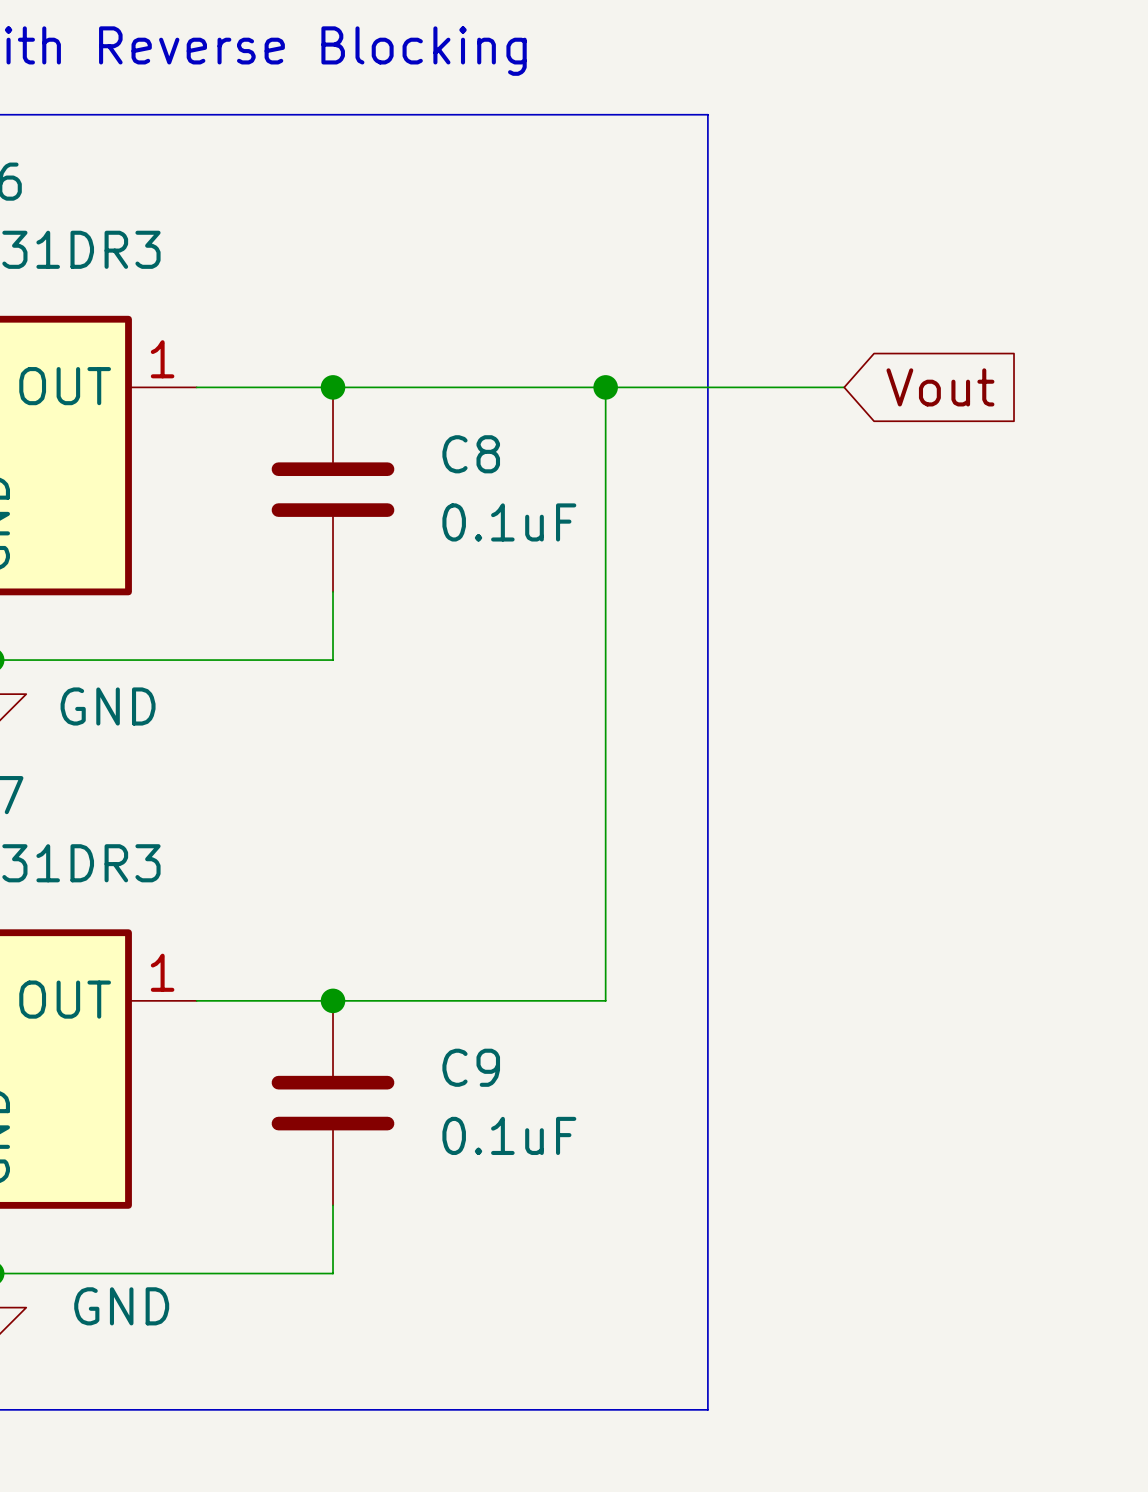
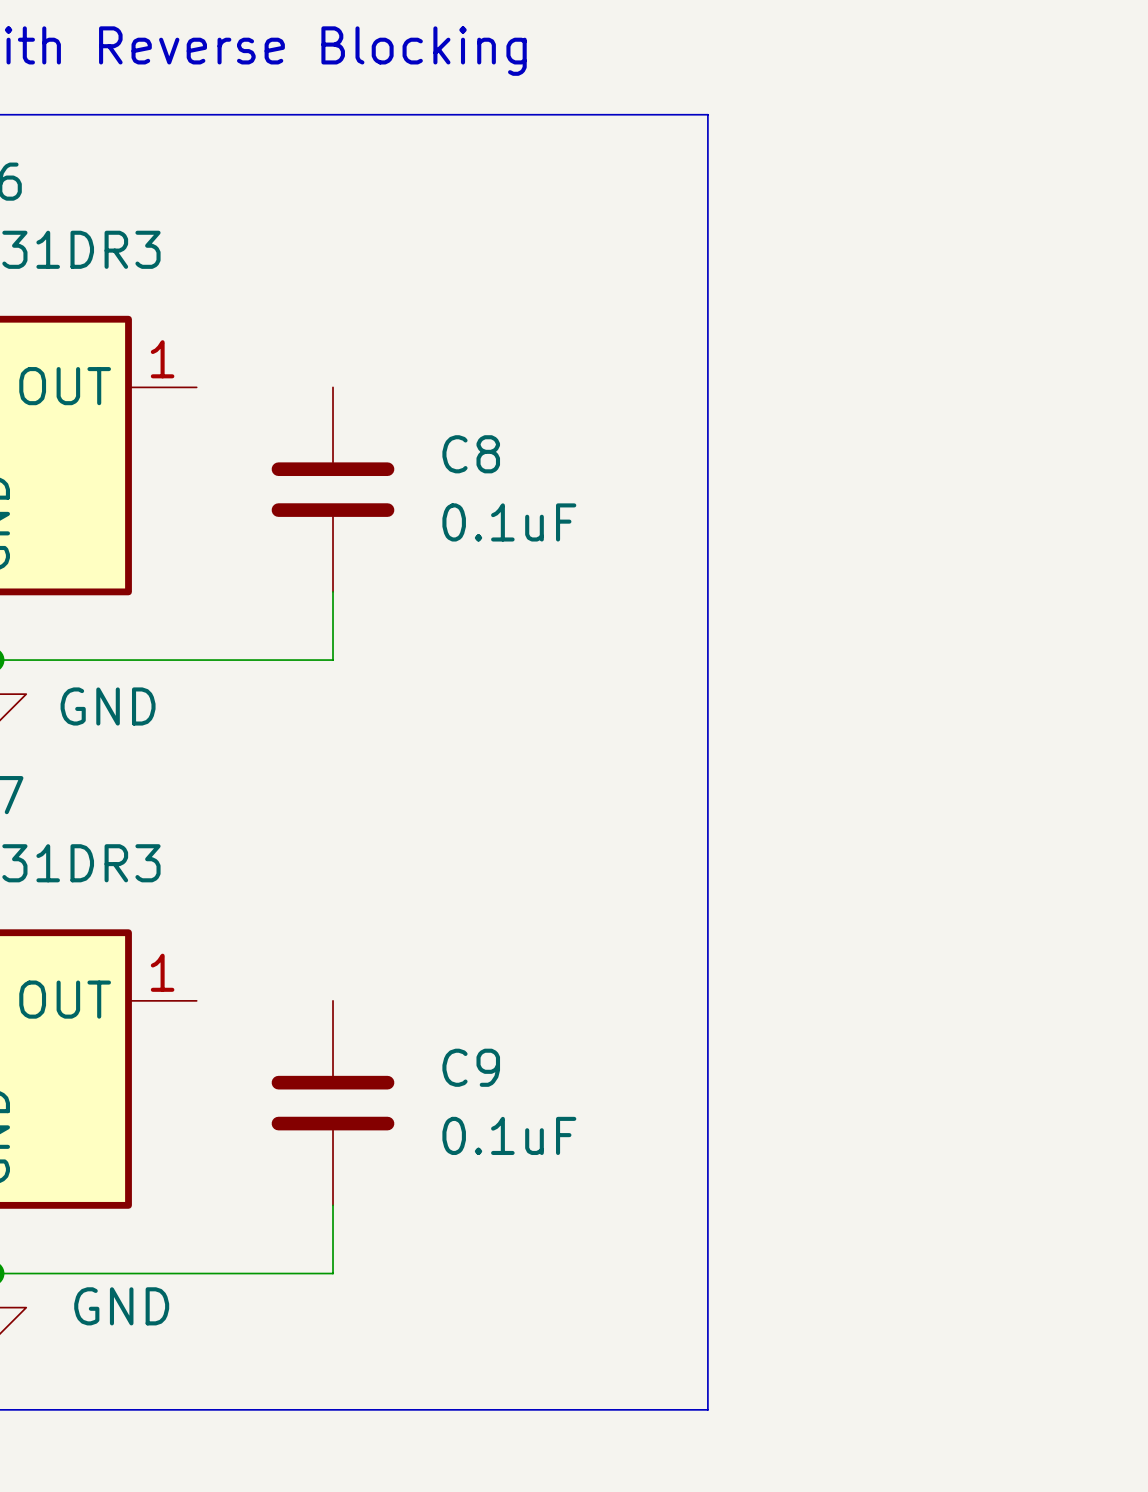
wire: (196, 387) (844, 387) -> none
junction: (333, 387) -> none
wire: (605, 387) (605, 1000) (196, 1000) -> none
junction: (605, 387) -> none
global label: Vout (940, 387) -> none
junction: (333, 1000) -> none

